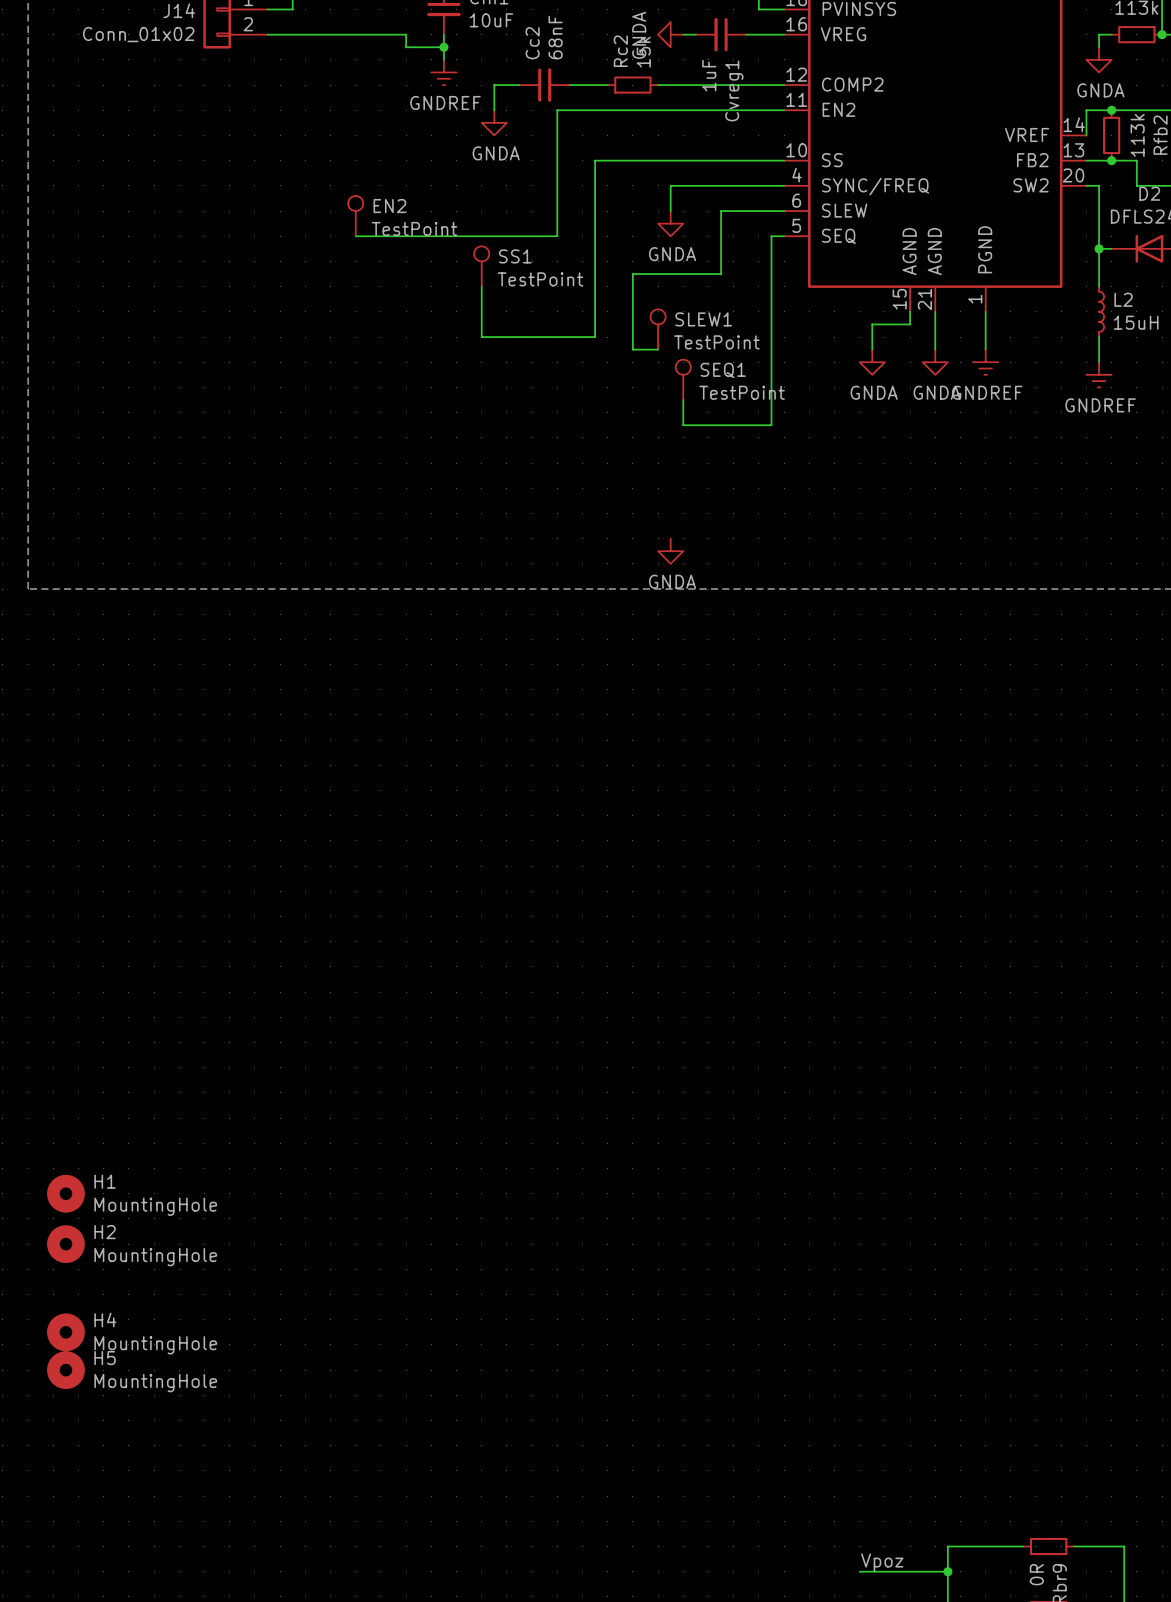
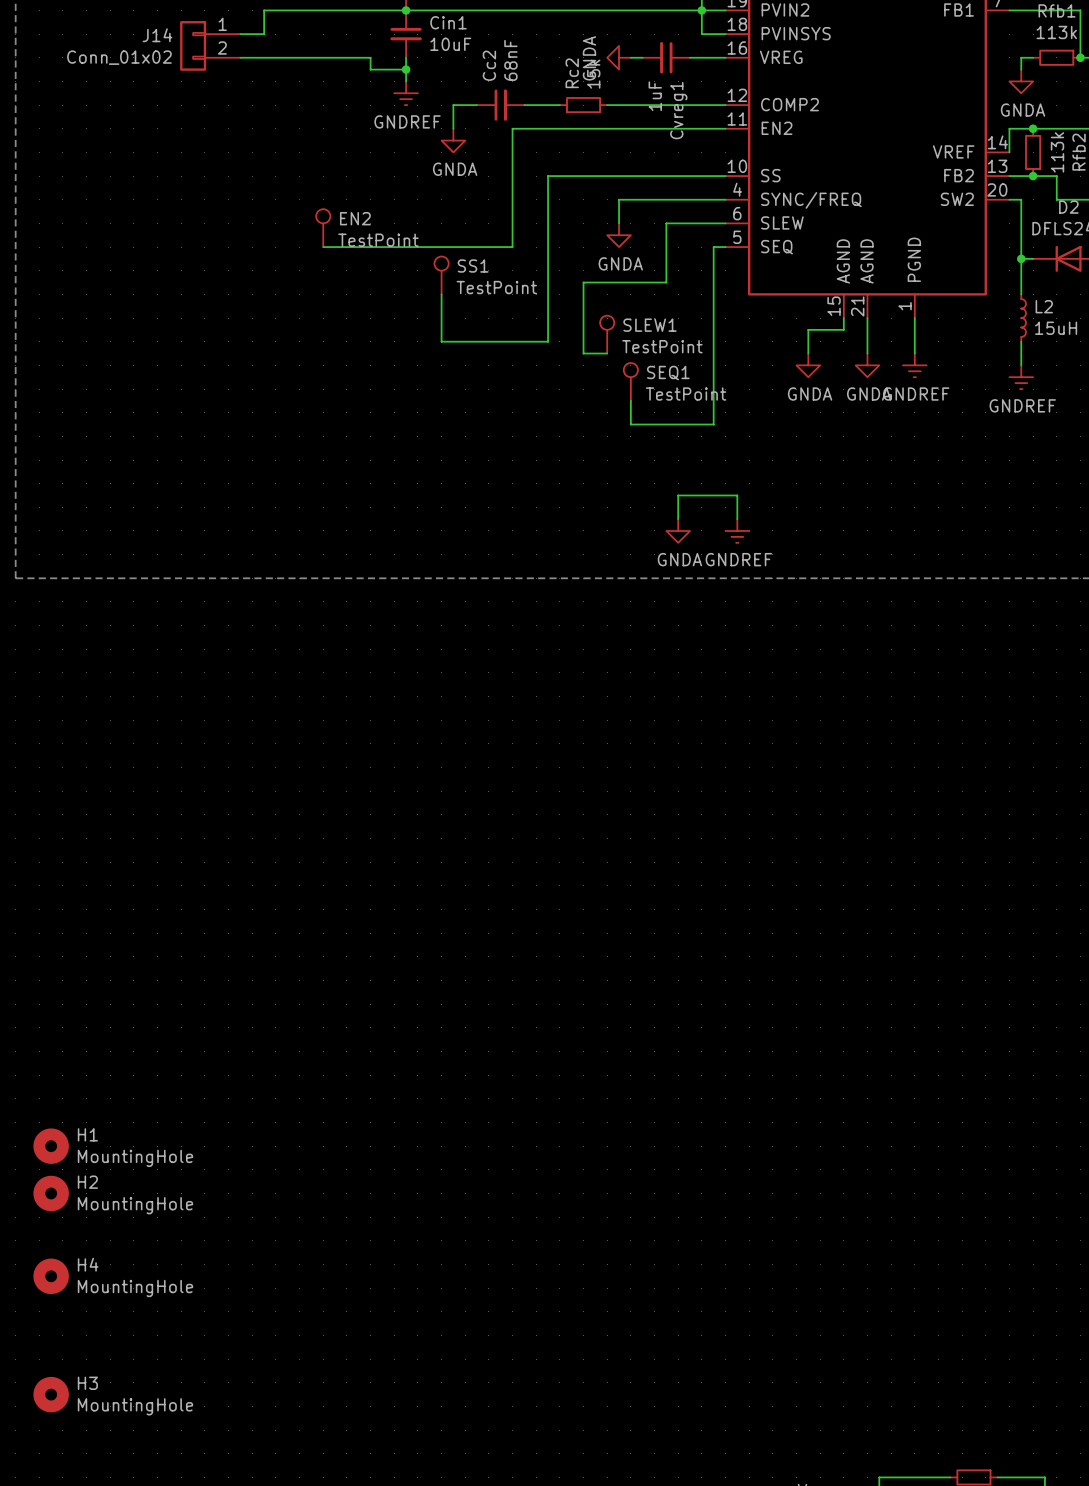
wire: none -> (678, 519) (678, 495) (737, 495) (737, 519)
power symbol: none -> GNDREF (737, 530)
power symbol position: GNDA (670, 551) -> GNDA (678, 530)
H5: MountingHole (65, 1370) -> none
H3: none -> MountingHole (51, 1394)

